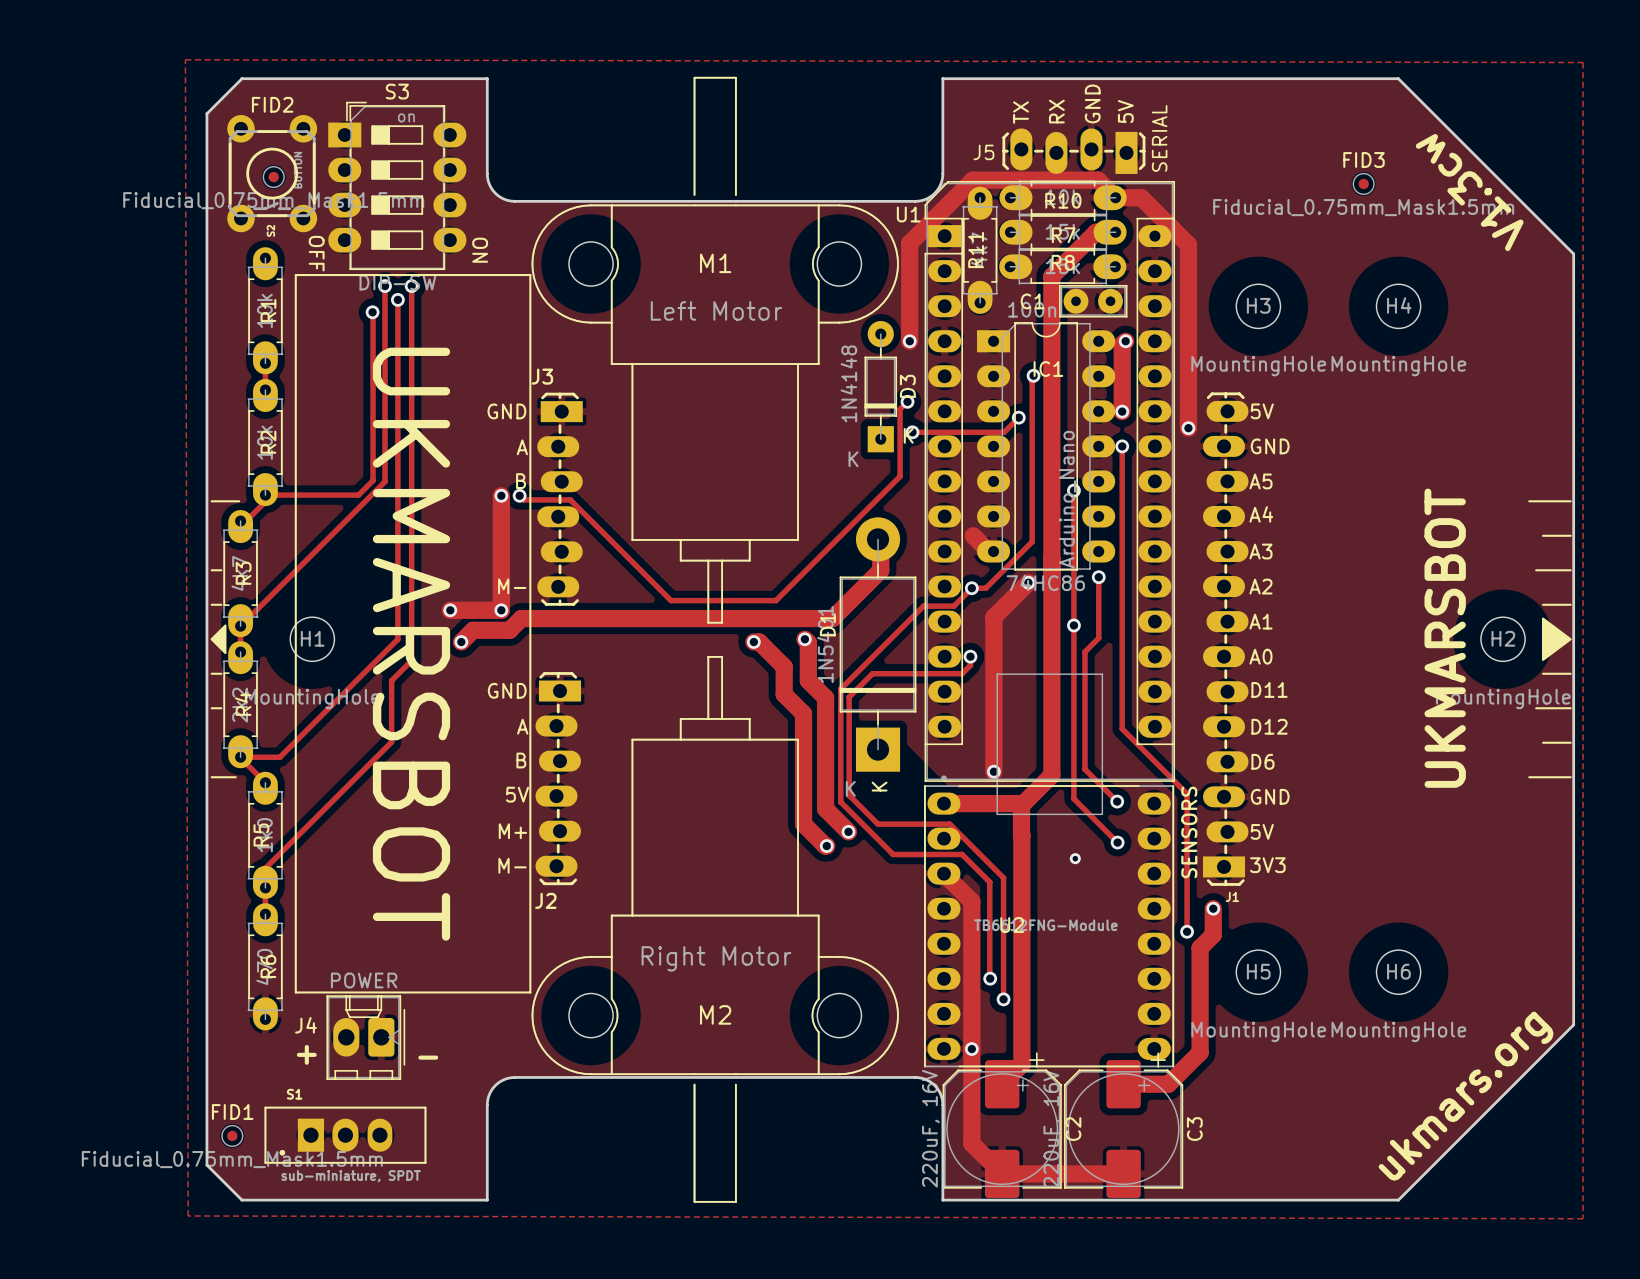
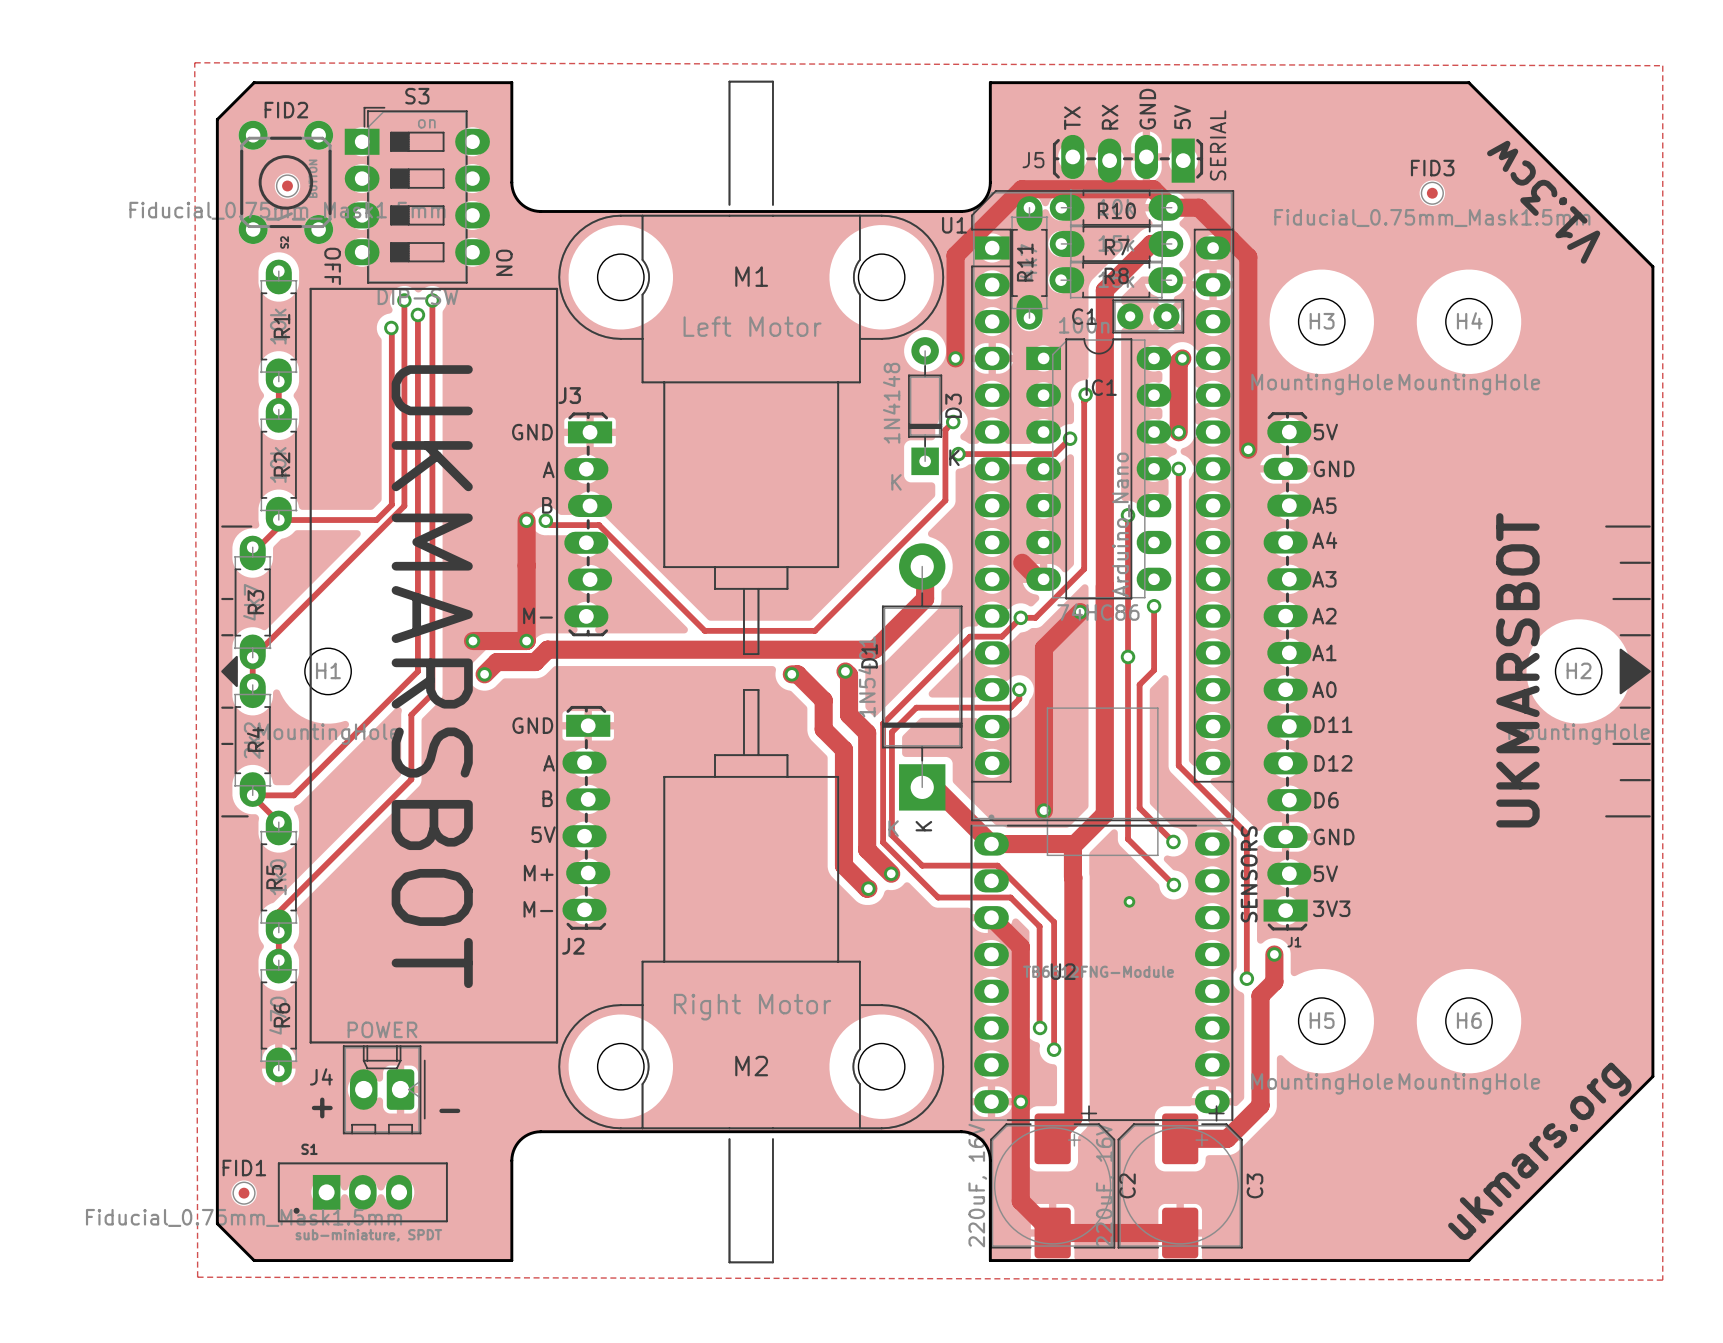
track: none -> (922, 787) (934, 787) (991, 844)

